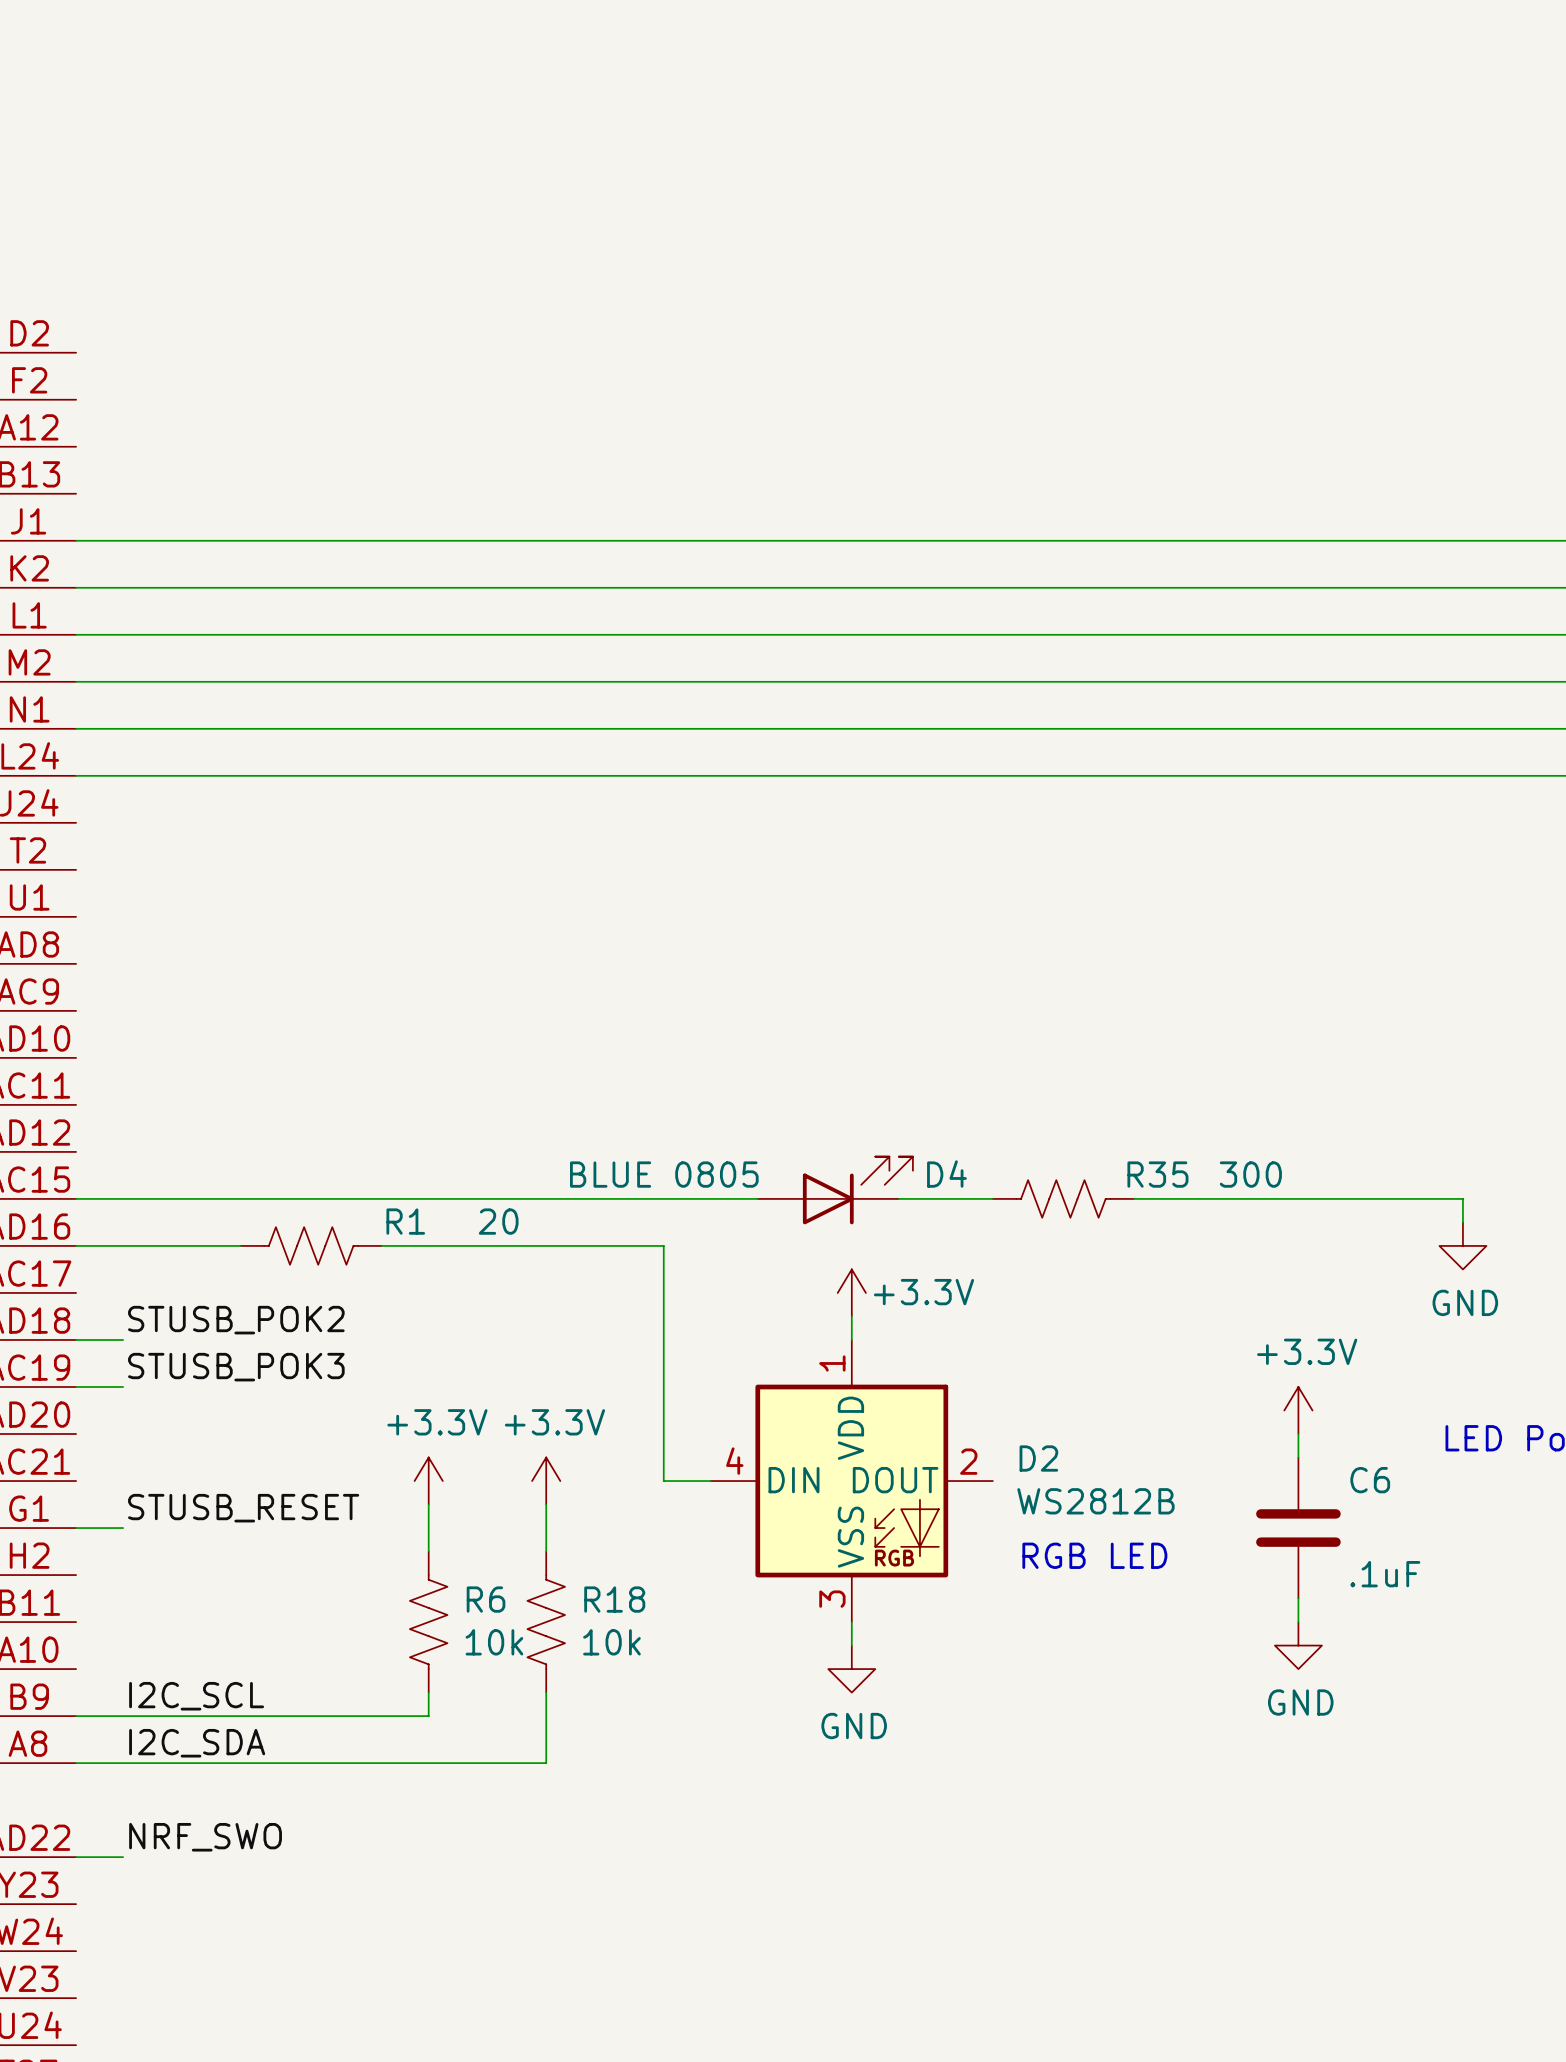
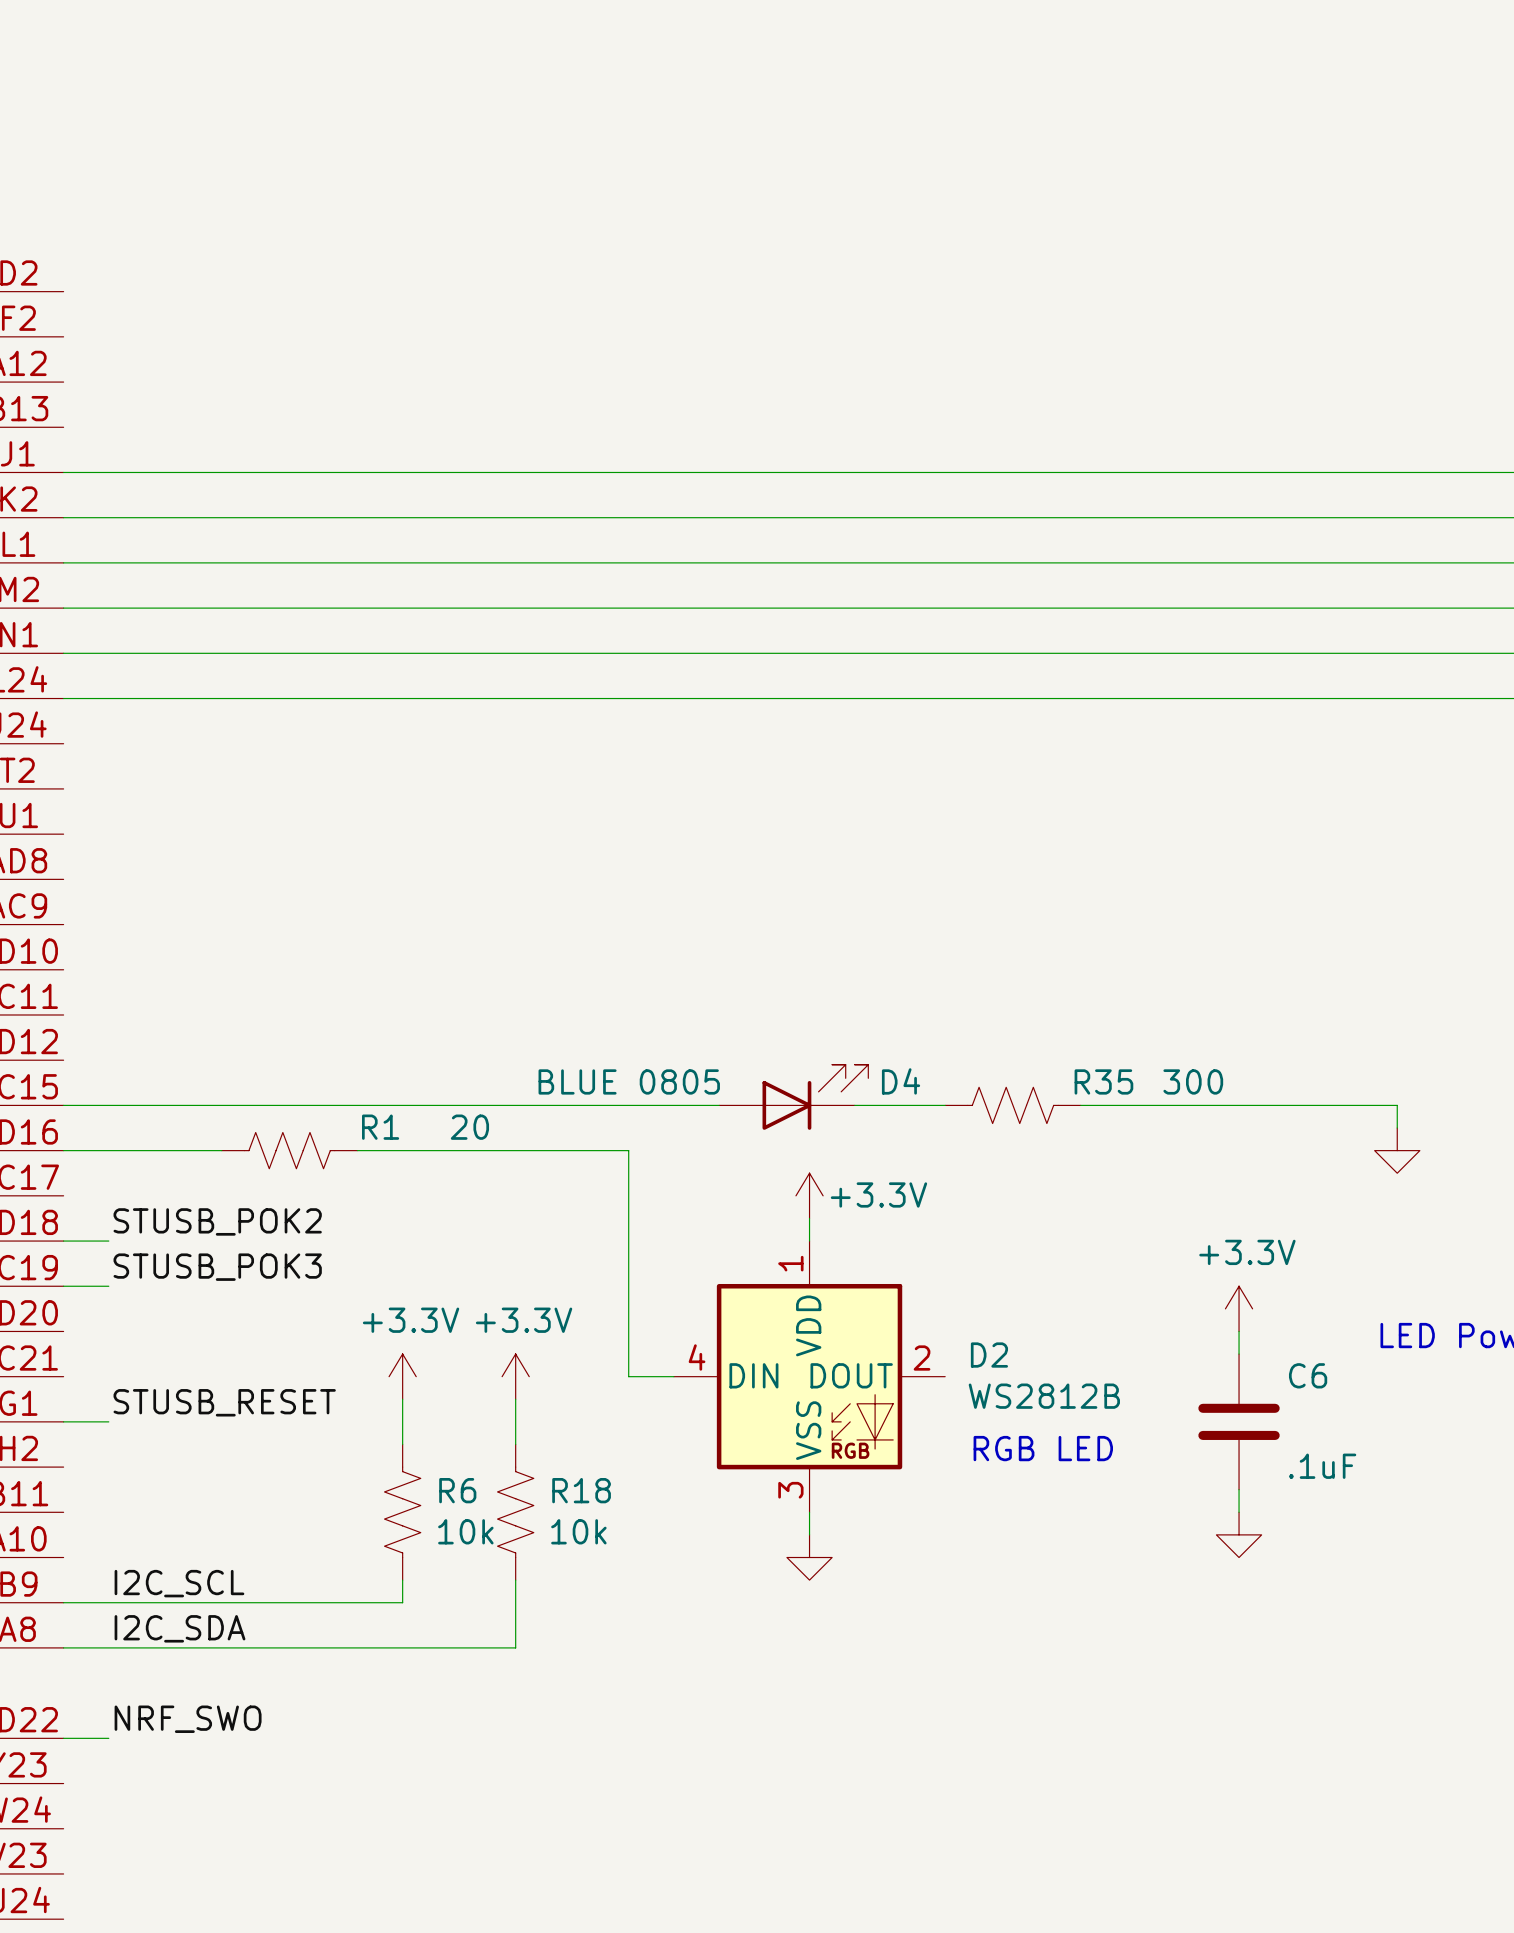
power symbol text: GND (1465, 1302) -> none
power symbol text: GND (1300, 1702) -> none
power symbol text: GND (854, 1726) -> none

